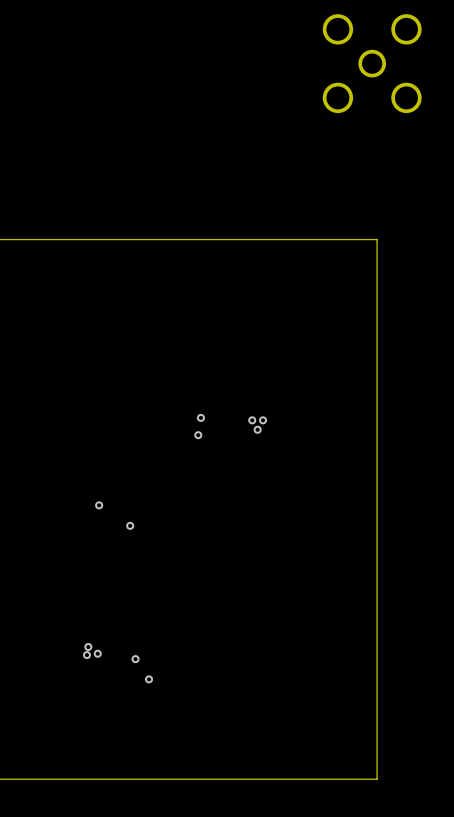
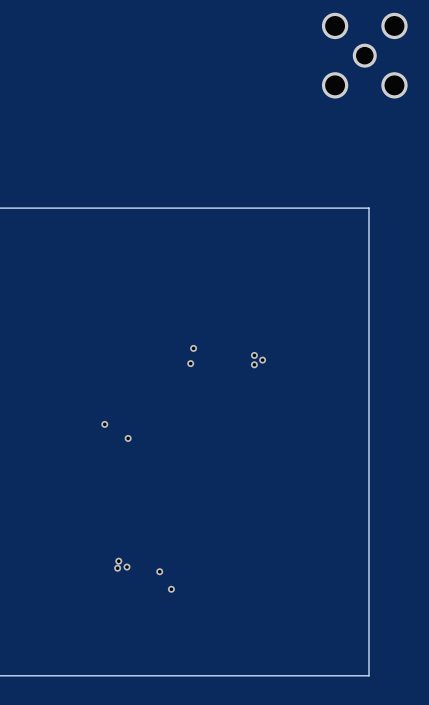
via: none -> (193, 348)
via: none -> (254, 355)
via: none -> (262, 360)
via: (200, 417) -> none
via: none -> (190, 363)
via: none -> (254, 364)
via: (252, 420) -> none
via: (263, 420) -> none
via: (257, 429) -> none
via: (198, 435) -> none
via: none -> (104, 424)
via: (130, 525) -> none

